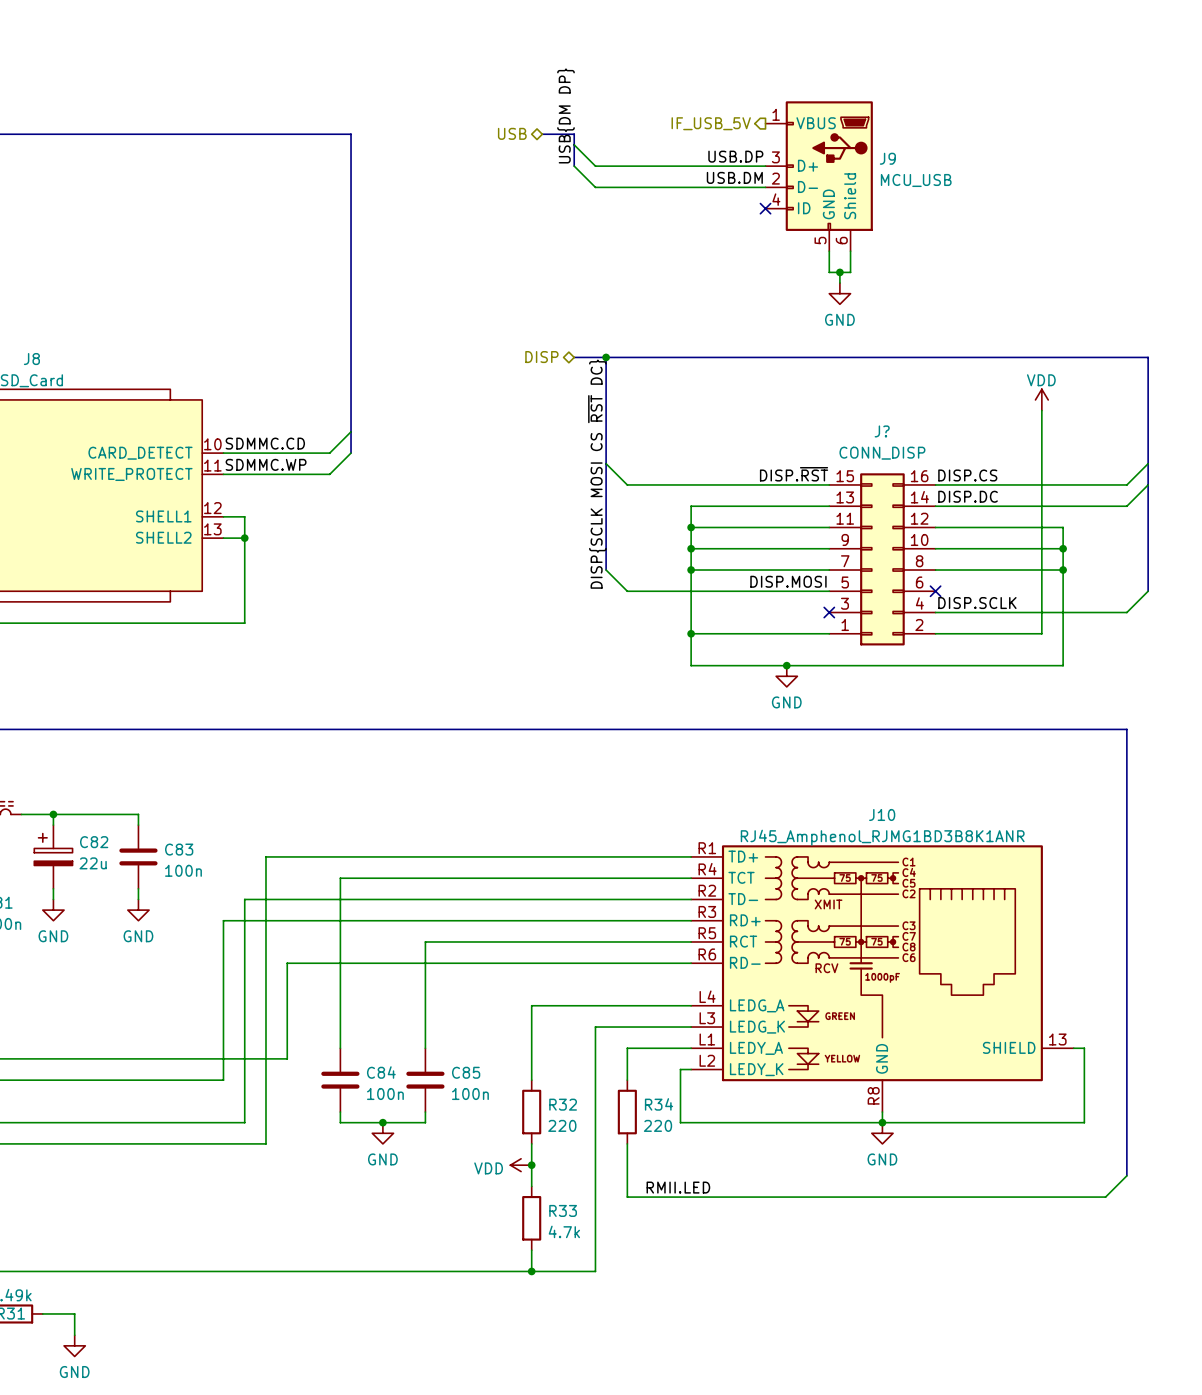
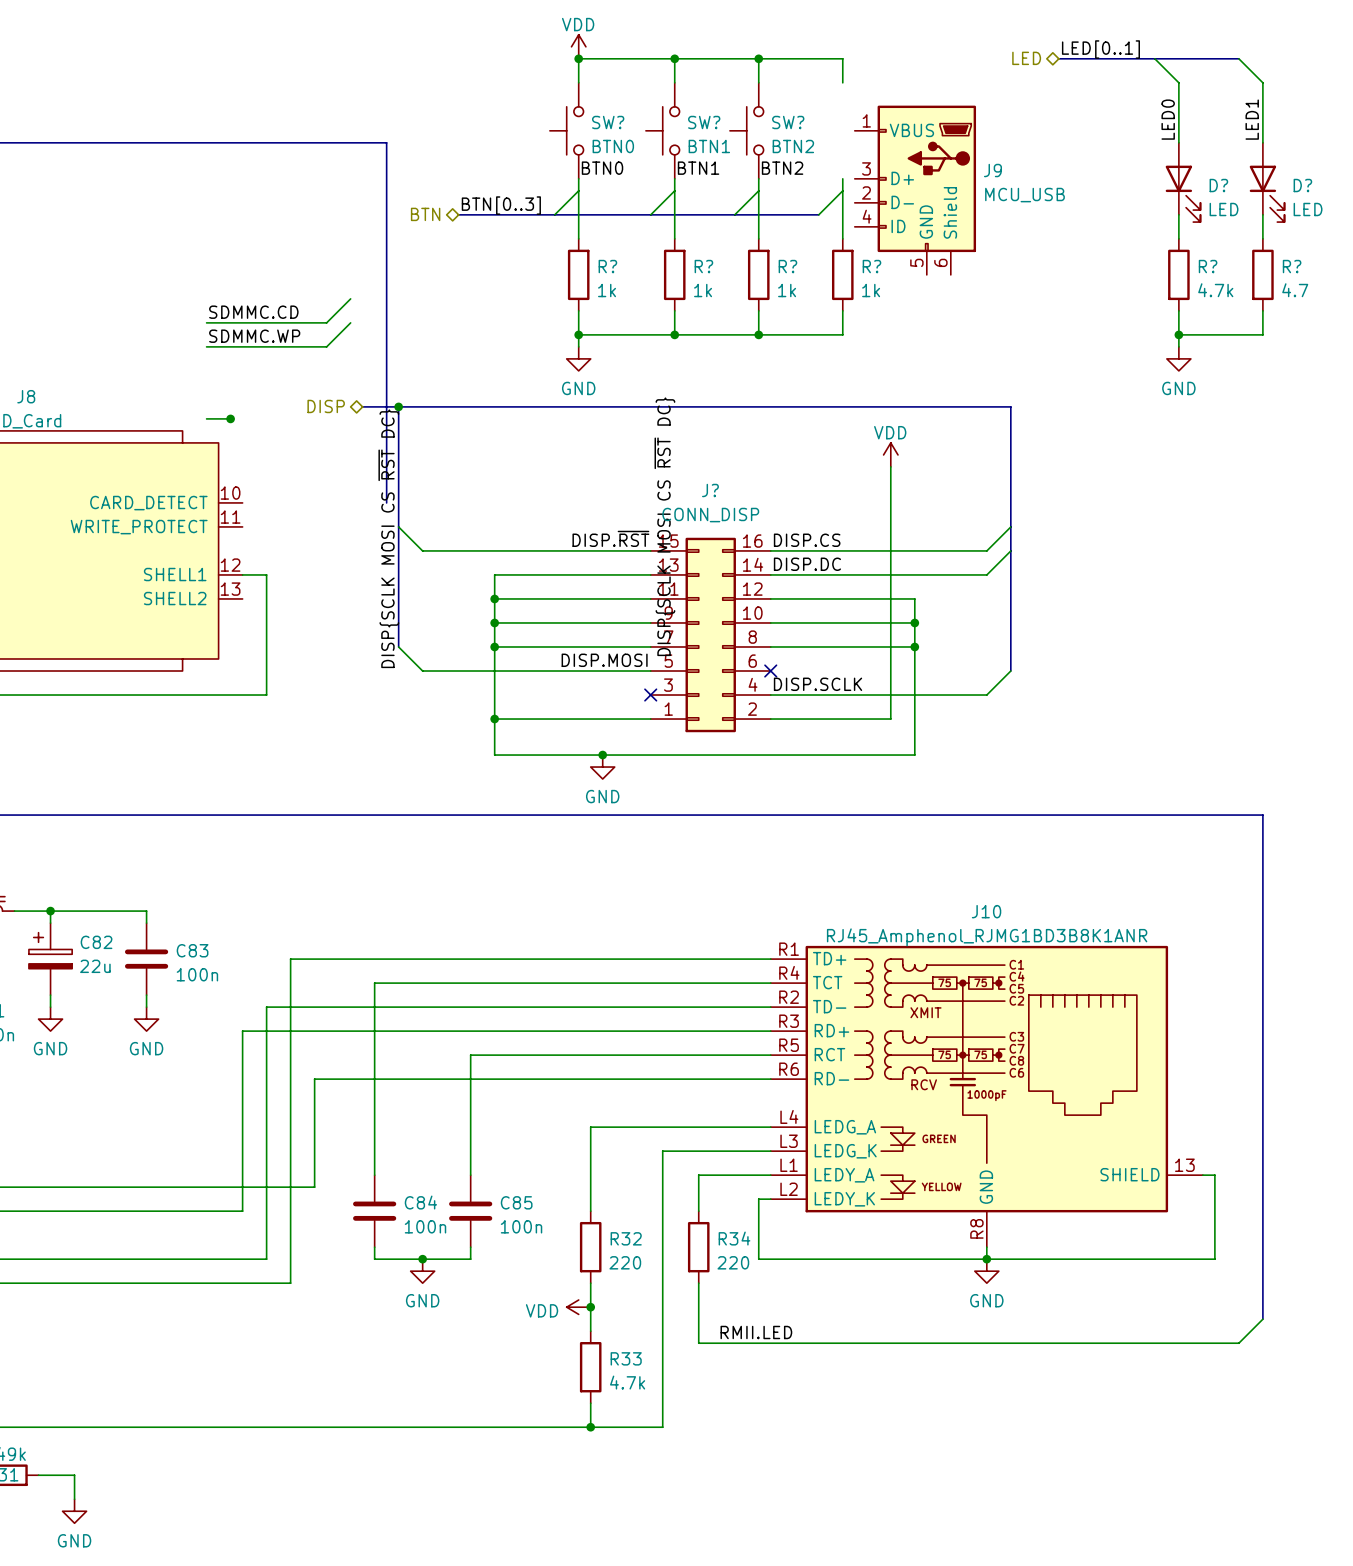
power symbol: none -> VDD (578, 46)
label: none -> LED[0..1] (1100, 49)
junction: none -> (578, 58)
wire: none -> (674, 58) (674, 82)
junction: none -> (674, 58)
wire: none -> (758, 58) (758, 82)
junction: none -> (758, 58)
hierarchical label: none -> LED (1026, 58)
bus: none -> (1058, 58) (1238, 58)
wire: none -> (1154, 58) (1178, 82) (1178, 142)
wire: none -> (1238, 58) (1262, 82) (1262, 142)
wire: none -> (578, 82) (578, 58) (842, 58) (842, 82)
label: none -> LED0 (1168, 119)
label: none -> LED1 (1252, 119)
label: USB{DM DP} (565, 115) -> none
SW?: none -> BTN0 (566, 130)
SW?: none -> BTN1 (662, 130)
SW?: none -> BTN2 (746, 130)
hierarchical label: IF_USB_5V (711, 123) -> none
hierarchical label: USB (512, 133) -> none
bus: (542, 134) (574, 134) (574, 166) -> none
wire: (574, 144) (595, 166) (765, 166) -> none
label: none -> BTN0 (602, 168)
label: none -> BTN1 (698, 168)
label: none -> BTN2 (782, 168)
label: USB.DP (735, 156) -> none
wire: none -> (578, 178) (578, 238)
wire: (574, 166) (595, 187) (765, 187) -> none
wire: none -> (674, 178) (674, 238)
wire: none -> (758, 178) (758, 238)
wire: none -> (842, 178) (842, 238)
D?: none -> LED (1183, 182)
D?: none -> LED (1267, 182)
wire: none -> (578, 190) (554, 214)
wire: none -> (674, 190) (650, 214)
wire: none -> (758, 190) (734, 214)
wire: none -> (842, 190) (818, 214)
label: USB.DM (734, 177) -> none
label: none -> BTN[0..3] (501, 205)
hierarchical label: none -> BTN (425, 214)
bus: none -> (458, 214) (818, 214)
wire: none -> (1178, 214) (1178, 238)
wire: none -> (1262, 214) (1262, 238)
no-connect mark: (765, 208) -> none
R?: none -> 1k (578, 274)
R?: none -> 1k (674, 274)
R?: none -> 1k (758, 274)
R?: none -> 1k (842, 274)
wire: (829, 251) (829, 272) (850, 272) (850, 251) -> none
R?: none -> 4.7k (1178, 274)
R?: none -> 4.7 (1262, 274)
wire: (839, 272) (839, 283) -> none
junction: (839, 272) -> none
wire: none -> (578, 310) (578, 346)
wire: none -> (674, 310) (674, 334)
wire: none -> (758, 310) (758, 334)
wire: none -> (842, 310) (842, 334) (578, 334)
wire: none -> (1178, 310) (1178, 346)
wire: none -> (1262, 310) (1262, 334) (1178, 334)
power symbol: GND (839, 293) -> none
junction: none -> (578, 334)
junction: none -> (674, 334)
junction: none -> (758, 334)
junction: none -> (1178, 334)
power symbol: none -> GND (578, 358)
power symbol: none -> GND (1178, 358)
hierarchical label: DISP (541, 357) -> none
bus: (574, 357) (1148, 357) (1148, 591) -> none
bus: (606, 357) (606, 570) -> none
junction: (606, 357) -> none
hierarchical label: none -> DISP (326, 406)
bus: none -> (362, 406) (1010, 406) (1010, 671)
bus: none -> (398, 406) (398, 646)
junction: none -> (398, 406)
junction: none -> (230, 418)
power symbol: VDD (1041, 399) -> none
power symbol: none -> VDD (890, 454)
wire: (1041, 410) (1041, 633) (935, 633) -> none
wire: none -> (890, 466) (890, 719) (770, 719)
wire: (351, 431) (329, 453) (223, 453) -> (350, 298) (326, 322) (206, 322)
label position: SDMMC.CD (265, 443) -> SDMMC.CD (253, 312)
wire: (351, 453) (329, 474) (223, 474) -> (350, 322) (326, 346) (206, 346)
wire: (606, 463) (627, 484) (829, 484) -> none
wire: (1148, 463) (1126, 484) (935, 484) -> none
label position: SDMMC.WP (266, 464) -> SDMMC.WP (254, 336)
wire: none -> (398, 526) (422, 550) (650, 550)
label: DISP.~{RST} (794, 474) -> DISP.CS (807, 540)
wire: none -> (1010, 526) (986, 550) (770, 550)
label: DISP.CS (967, 475) -> none
label: none -> DISP{SCLK MOSI CS ~{RST} DC} (388, 538)
label: none -> DISP.~{RST} (610, 538)
wire: (1148, 484) (1126, 506) (935, 506) -> none
wire: none -> (1010, 550) (986, 574) (770, 574)
label: DISP.DC (968, 496) -> none
wire: (829, 506) (691, 506) (691, 665) (1063, 665) (1063, 527) (935, 527) -> none
label: none -> DISP.DC (807, 564)
wire: none -> (650, 574) (494, 574) (494, 755) (914, 755) (914, 598) (770, 598)
wire: (691, 527) (829, 527) -> none
junction: (691, 527) -> none
wire: (223, 538) (244, 538) -> (206, 418) (230, 418)
junction: (244, 538) -> none
wire: none -> (494, 598) (650, 598)
junction: none -> (494, 598)
wire: (691, 548) (829, 548) -> none
junction: (691, 548) -> none
wire: (935, 548) (1063, 548) -> none
junction: (1063, 548) -> none
wire: none -> (494, 622) (650, 622)
junction: none -> (494, 622)
wire: none -> (770, 622) (914, 622)
junction: none -> (914, 622)
J?: CONN_DISP (882, 559) -> none
wire: (606, 570) (627, 591) (829, 591) -> none
J?: none -> CONN_DISP (710, 634)
wire: (691, 570) (829, 570) -> none
junction: (691, 570) -> none
wire: (935, 570) (1063, 570) -> none
junction: (1063, 570) -> none
wire: none -> (398, 646) (422, 671) (650, 671)
wire: none -> (494, 646) (650, 646)
junction: none -> (494, 646)
wire: none -> (770, 646) (914, 646)
junction: none -> (914, 646)
label: DISP.MOSI (788, 581) -> none
no-connect mark: (935, 591) -> none
wire: (1148, 591) (1126, 612) (935, 612) -> none
label: none -> DISP.MOSI (604, 660)
no-connect mark: none -> (770, 671)
wire: none -> (1010, 671) (986, 695) (770, 695)
label: DISP.SCLK (977, 603) -> none
no-connect mark: (829, 612) -> none
label: none -> DISP.SCLK (818, 684)
no-connect mark: none -> (650, 695)
wire: (691, 633) (829, 633) -> none
junction: (691, 633) -> none
wire: none -> (494, 719) (650, 719)
junction: none -> (494, 719)
junction: (786, 665) -> none
junction: none -> (602, 755)
power symbol: GND (786, 676) -> none
power symbol: none -> GND (602, 767)

